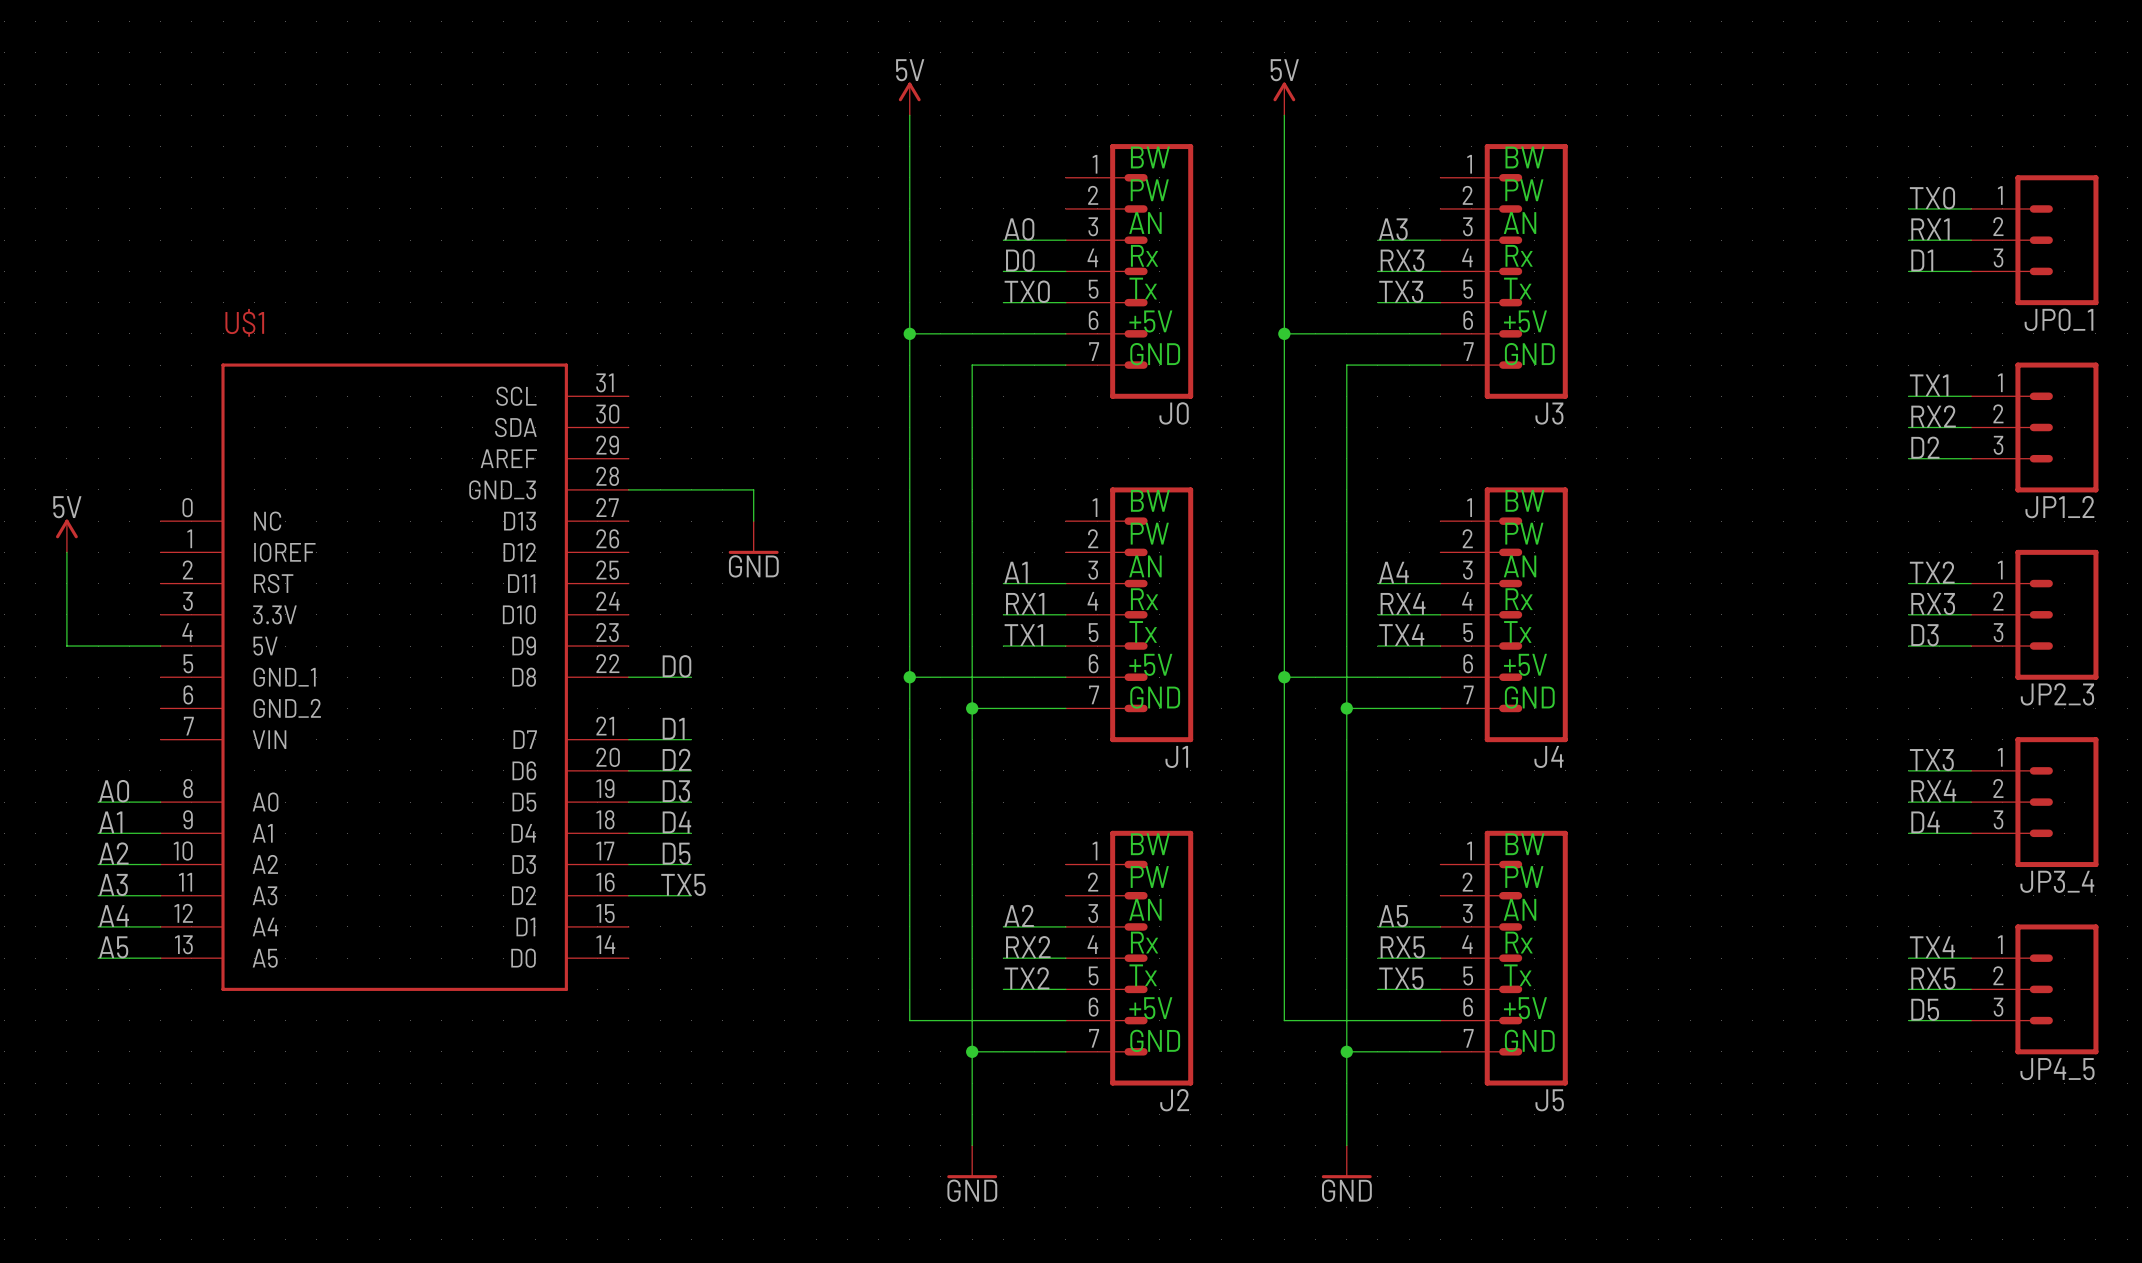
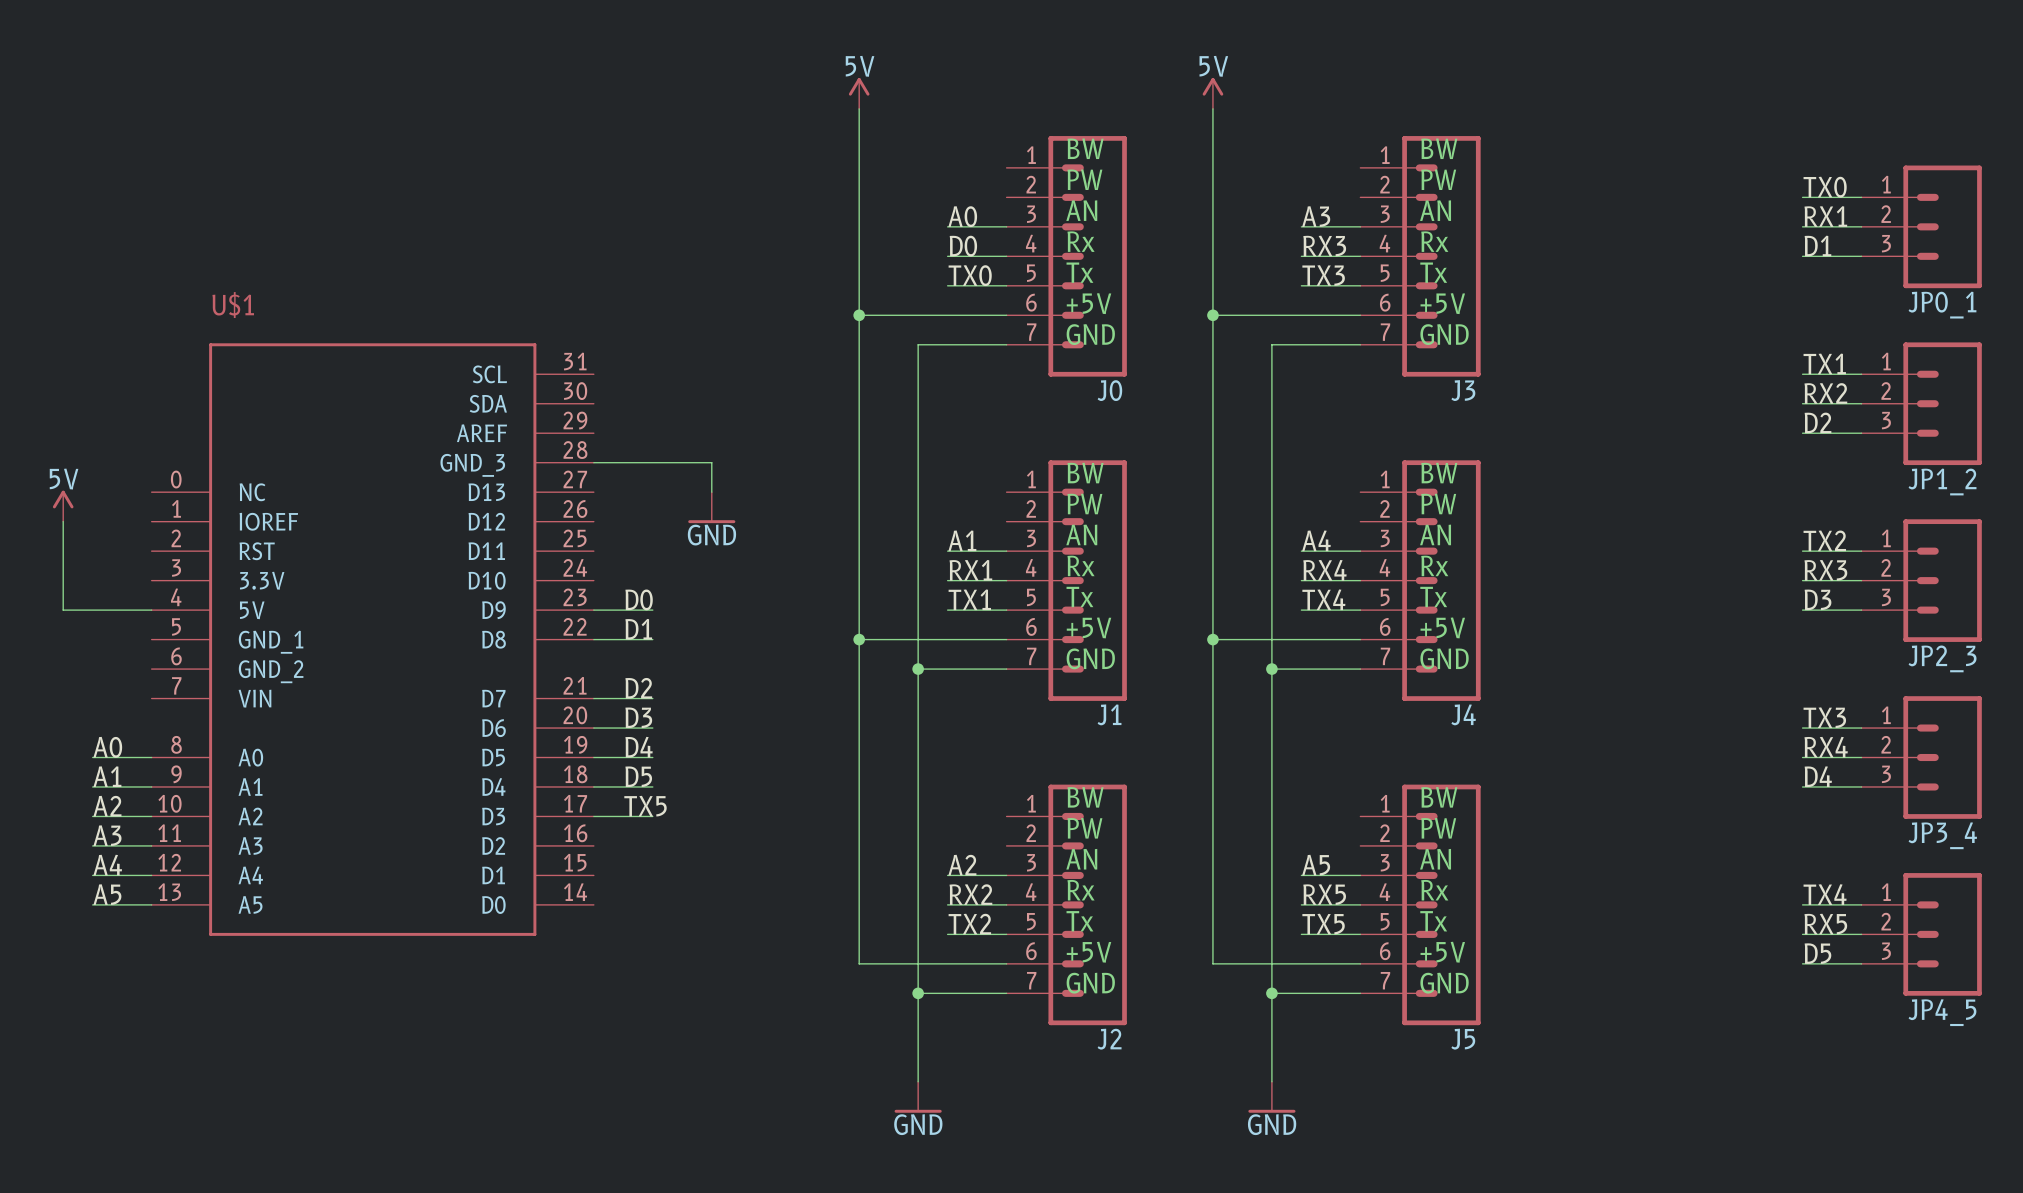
label: none -> D0 (639, 599)
label: D0 (676, 666) -> D1 (638, 629)
label: D1 (673, 728) -> D2 (638, 688)
label: D2 (676, 759) -> D3 (638, 717)
label: D3 (676, 791) -> D4 (639, 747)
label: D4 (676, 822) -> D5 (638, 776)
label: D5 (676, 853) -> TX5 (645, 806)
label: TX5 (683, 884) -> none
wire: (628, 895) (691, 895) -> (593, 610) (652, 610)

